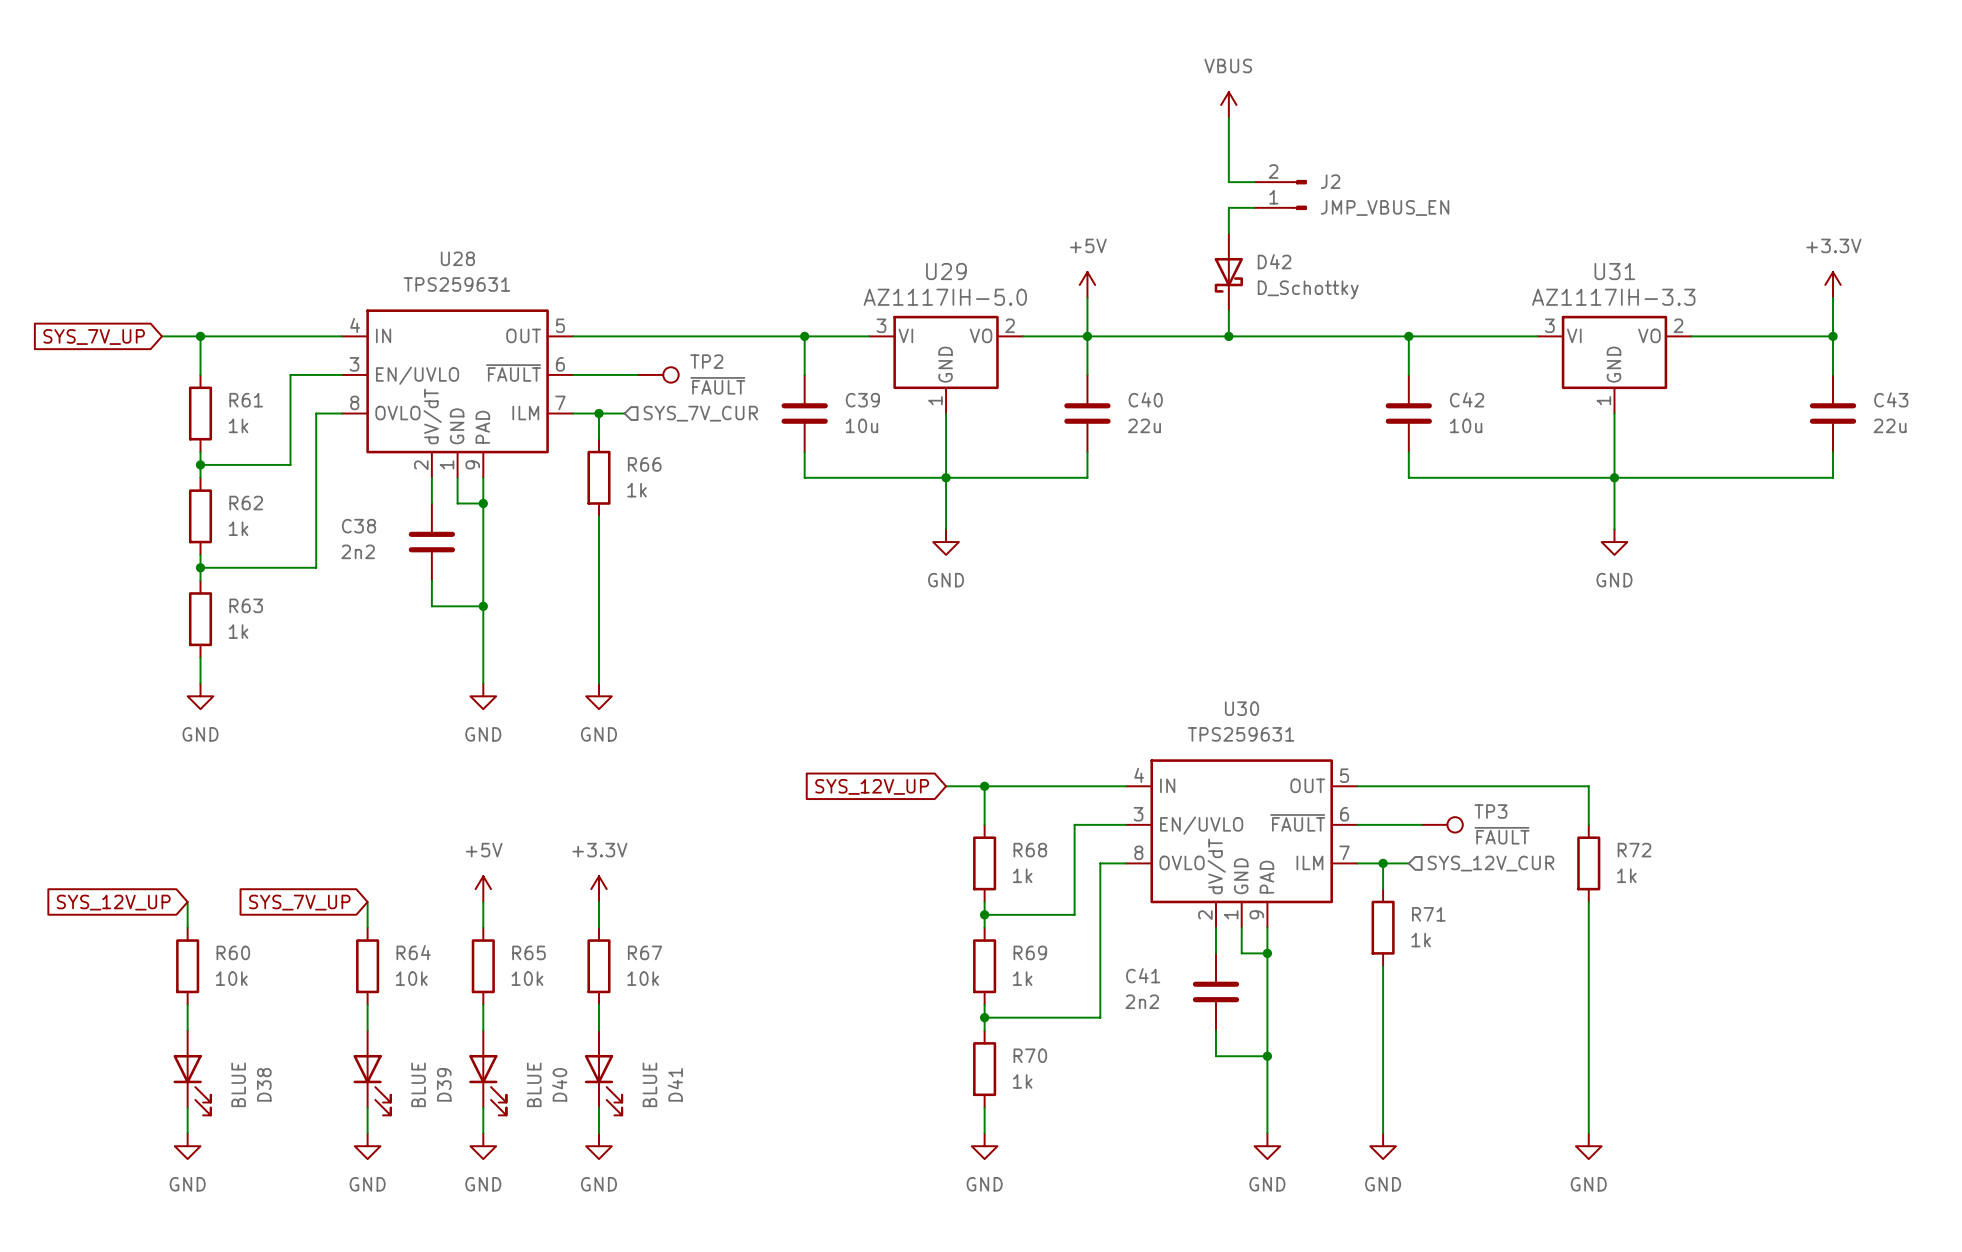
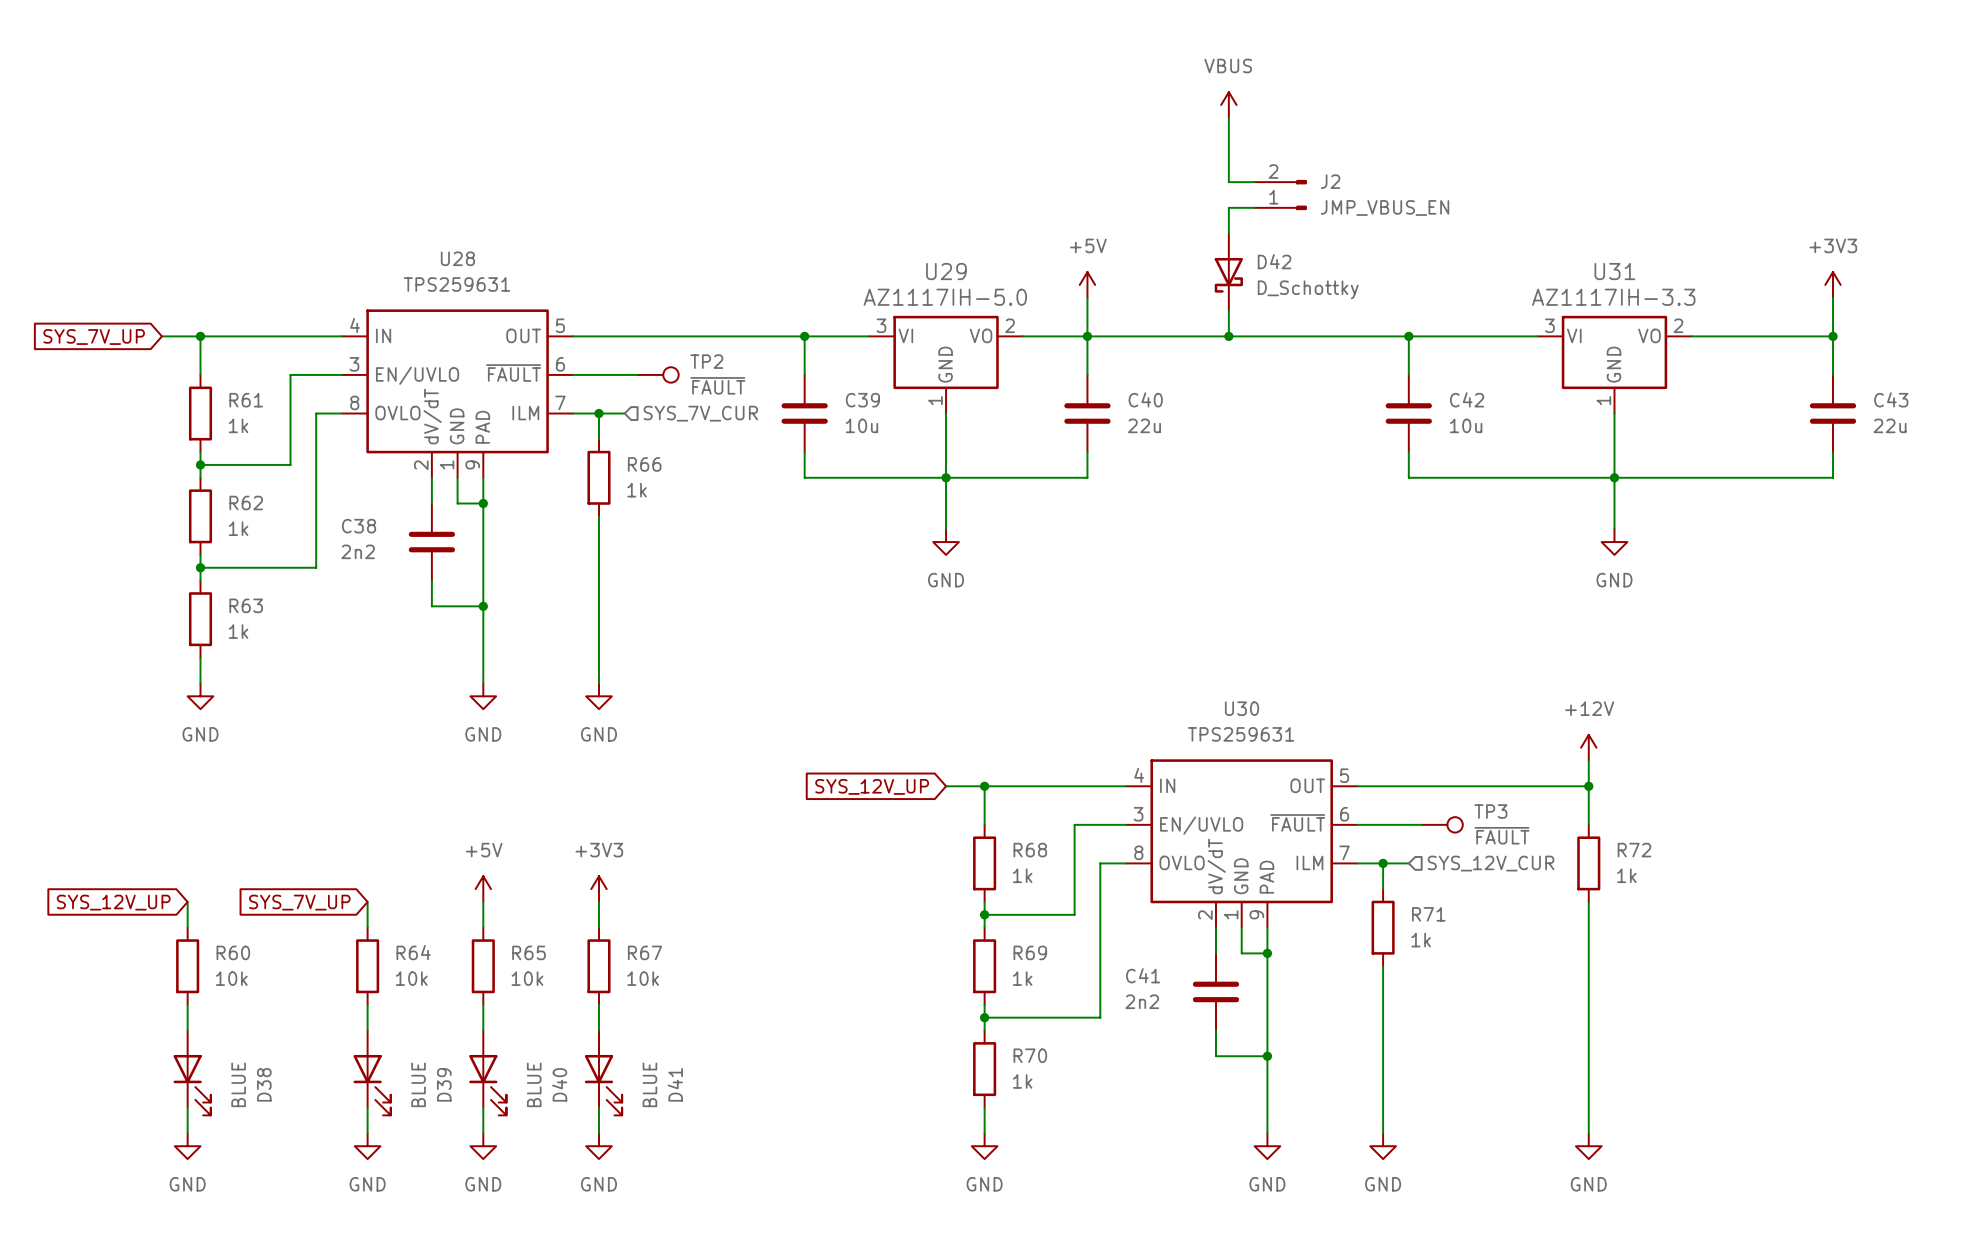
power symbol: +3.3V (1833, 284) -> +3V3 (1833, 284)
power symbol: none -> +12V (1588, 747)
wire: none -> (1588, 760) (1588, 786)
junction: none -> (1588, 786)
power symbol: +3.3V (598, 889) -> +3V3 (598, 889)

